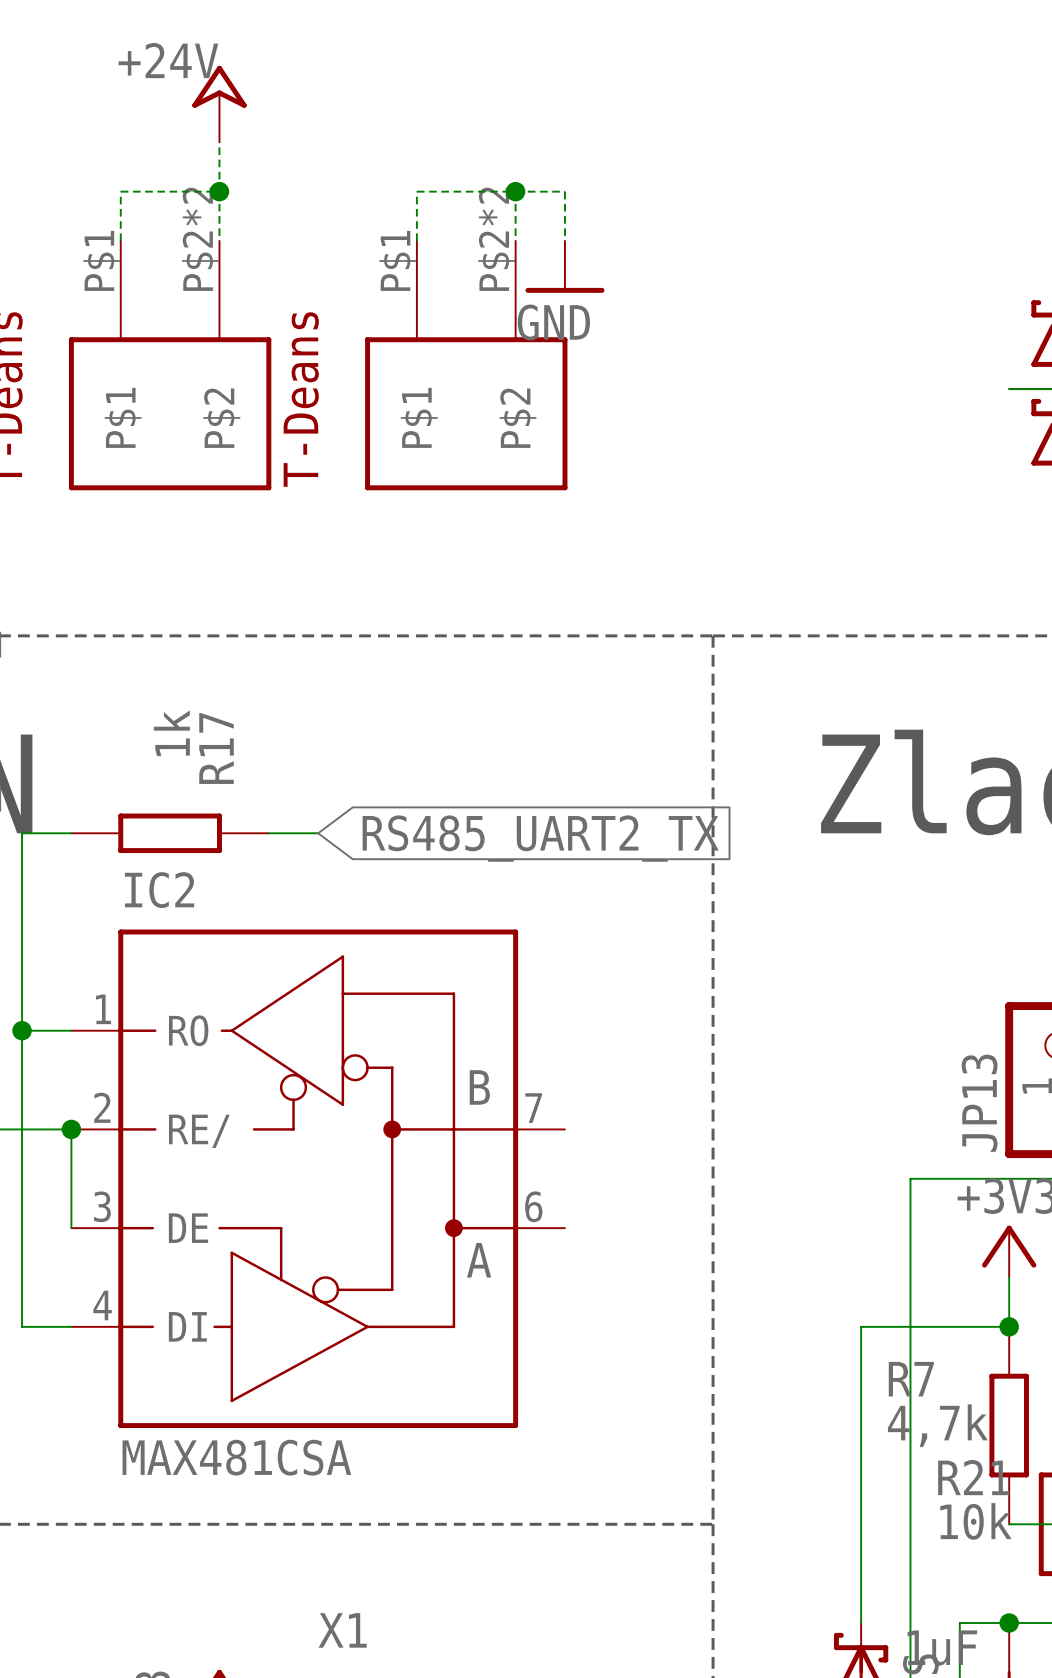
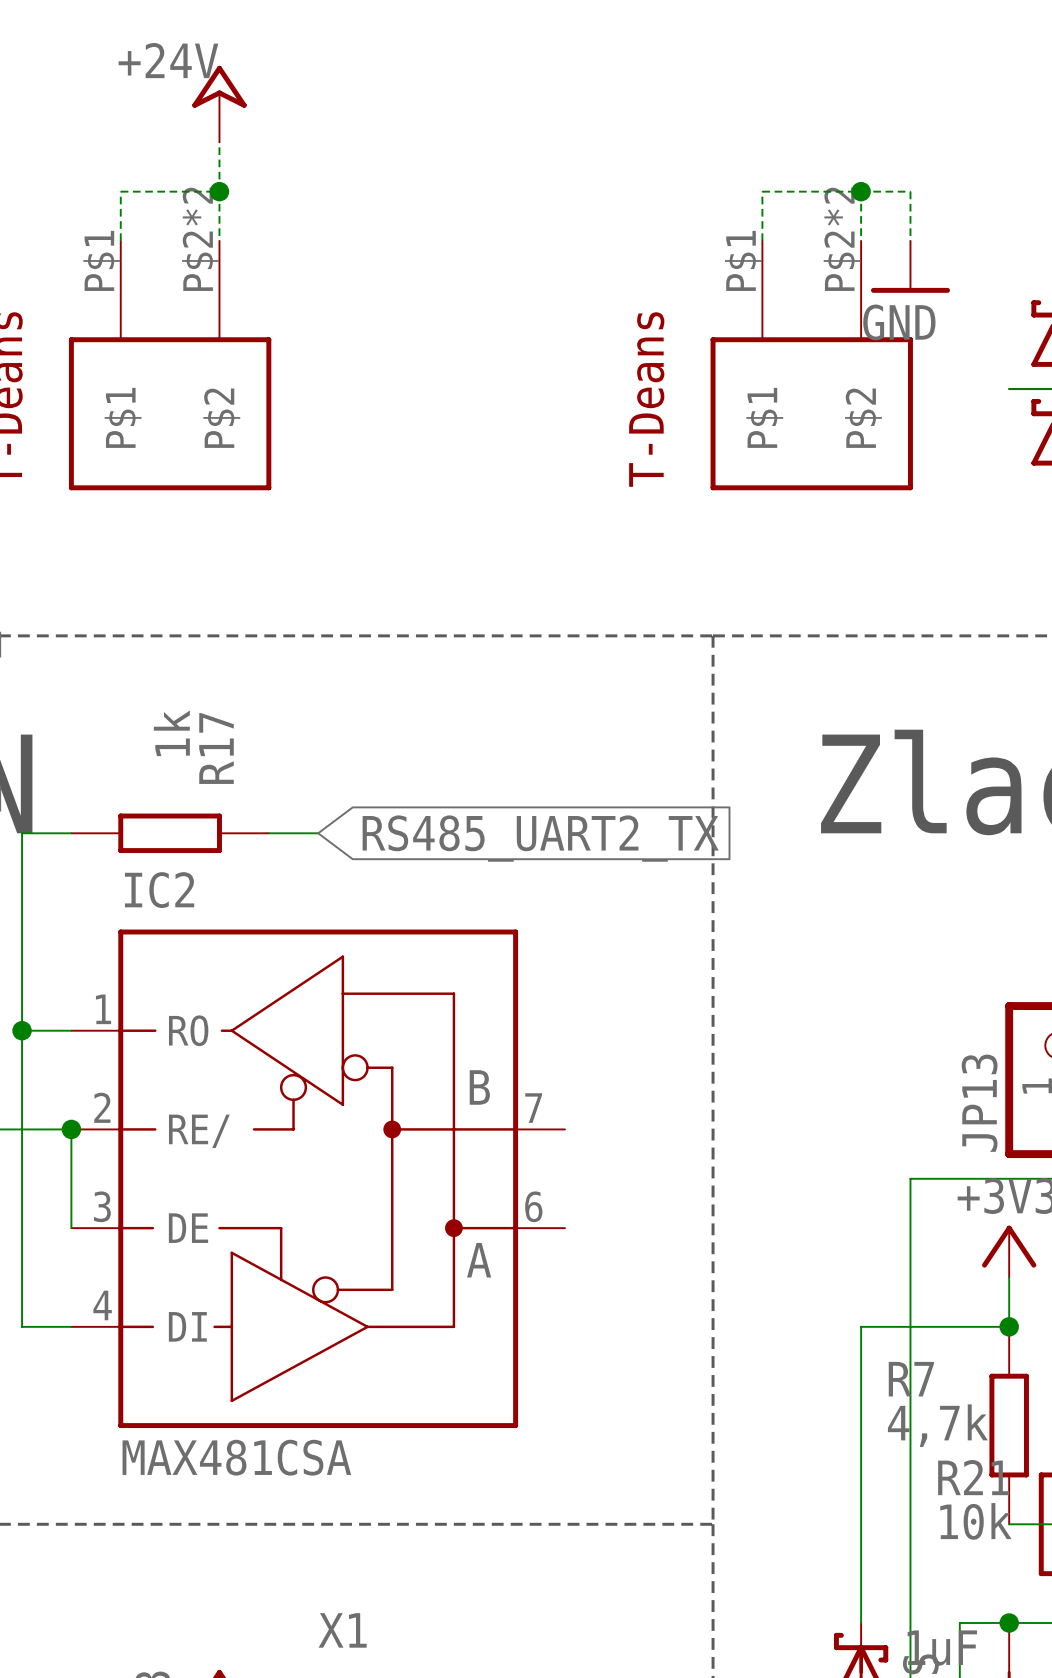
wire: (515, 191) (515, 241) -> (861, 191) (861, 241)
junction: (515, 191) -> none
junction: none -> (861, 191)
wire: (416, 241) (416, 191) (564, 191) (564, 241) -> (762, 241) (762, 191) (910, 191) (910, 241)
power symbol: GND (564, 266) -> none
power symbol: none -> GND (910, 266)
part: (466, 365) -> none
part: none -> (811, 365)

